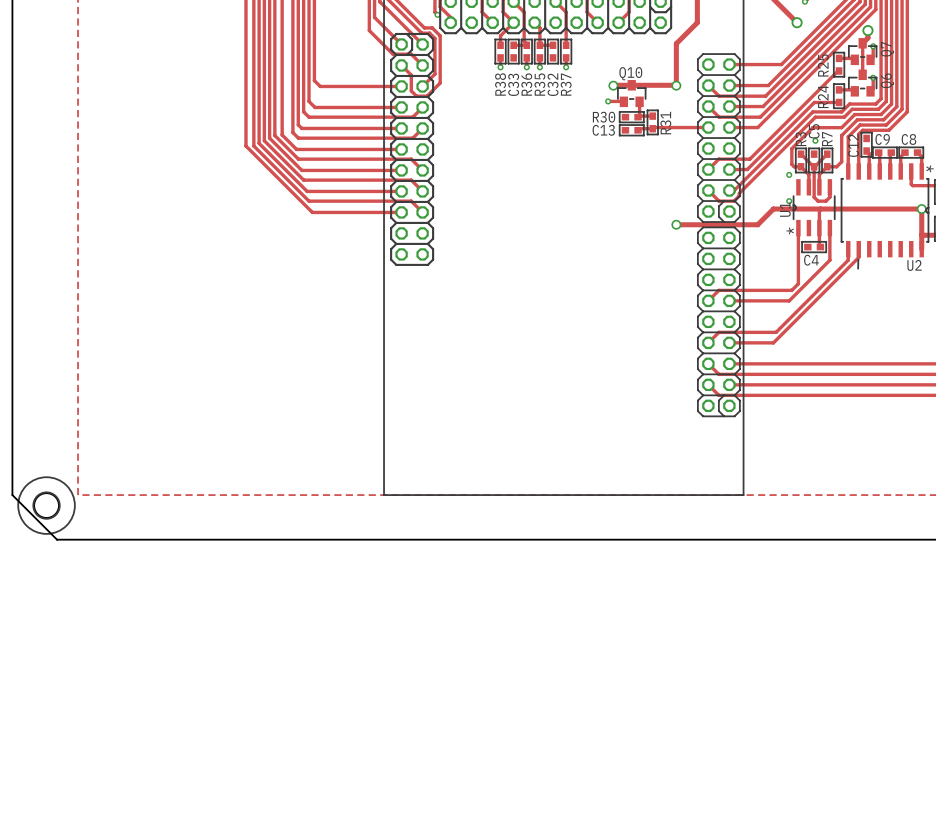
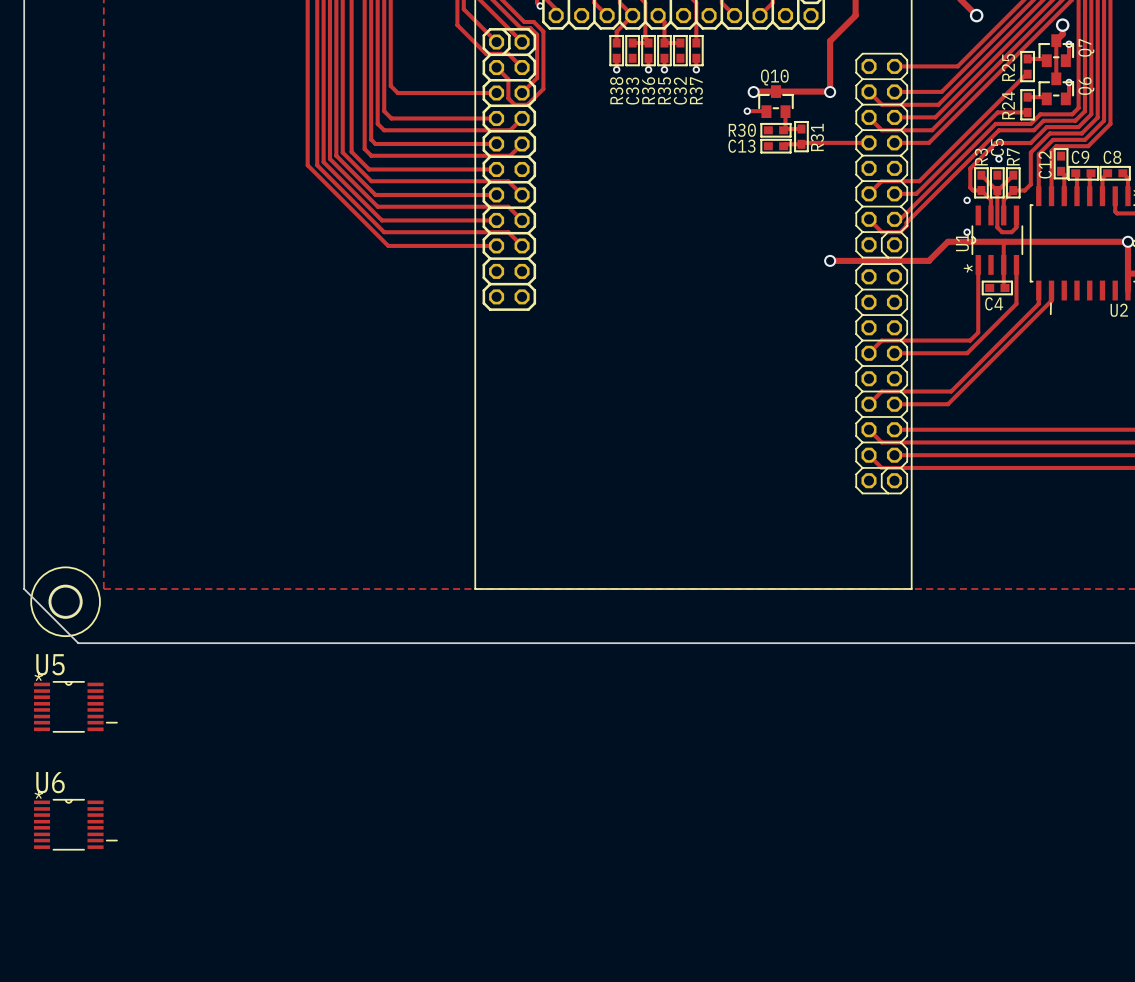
U5: none -> (75, 706)
U6: none -> (75, 824)

